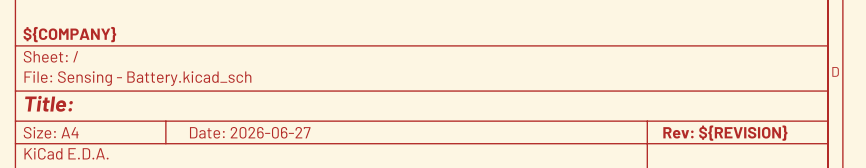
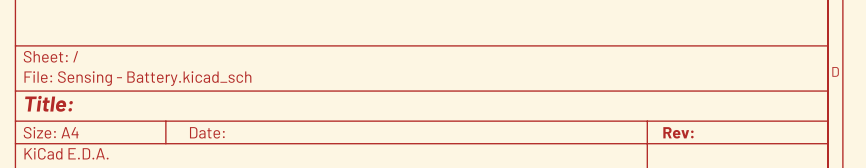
title block: ${COMPANY} (69, 34) -> none
title block: Date: 2026-06-27 (250, 132) -> Date: (207, 132)
title block: Rev: ${REVISION} (725, 133) -> Rev: (678, 132)

